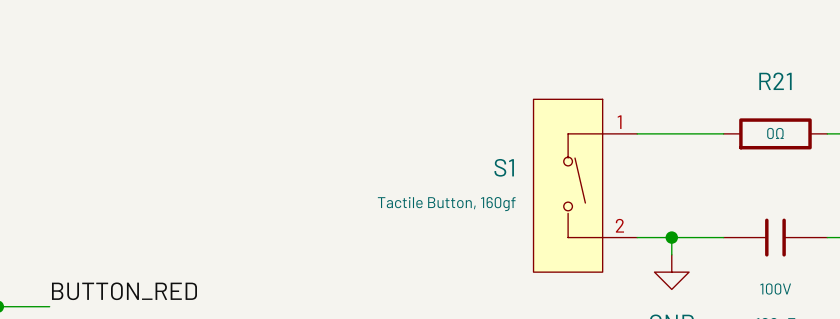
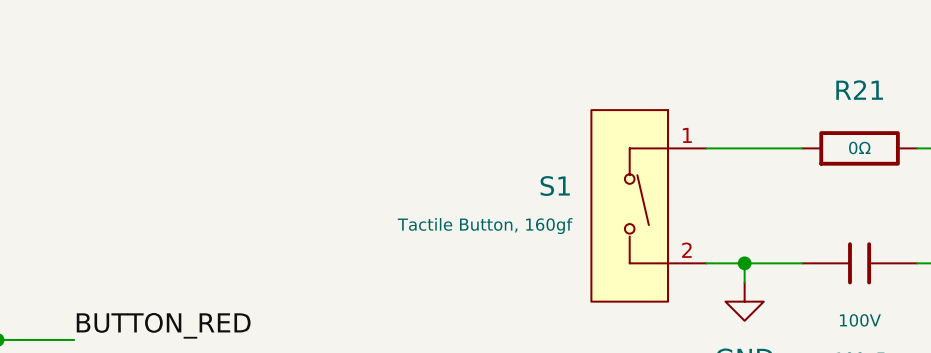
label position: BUTTON_RED (124, 291) -> BUTTON_RED (163, 325)
wire: none -> (55, 339) (74, 339)

